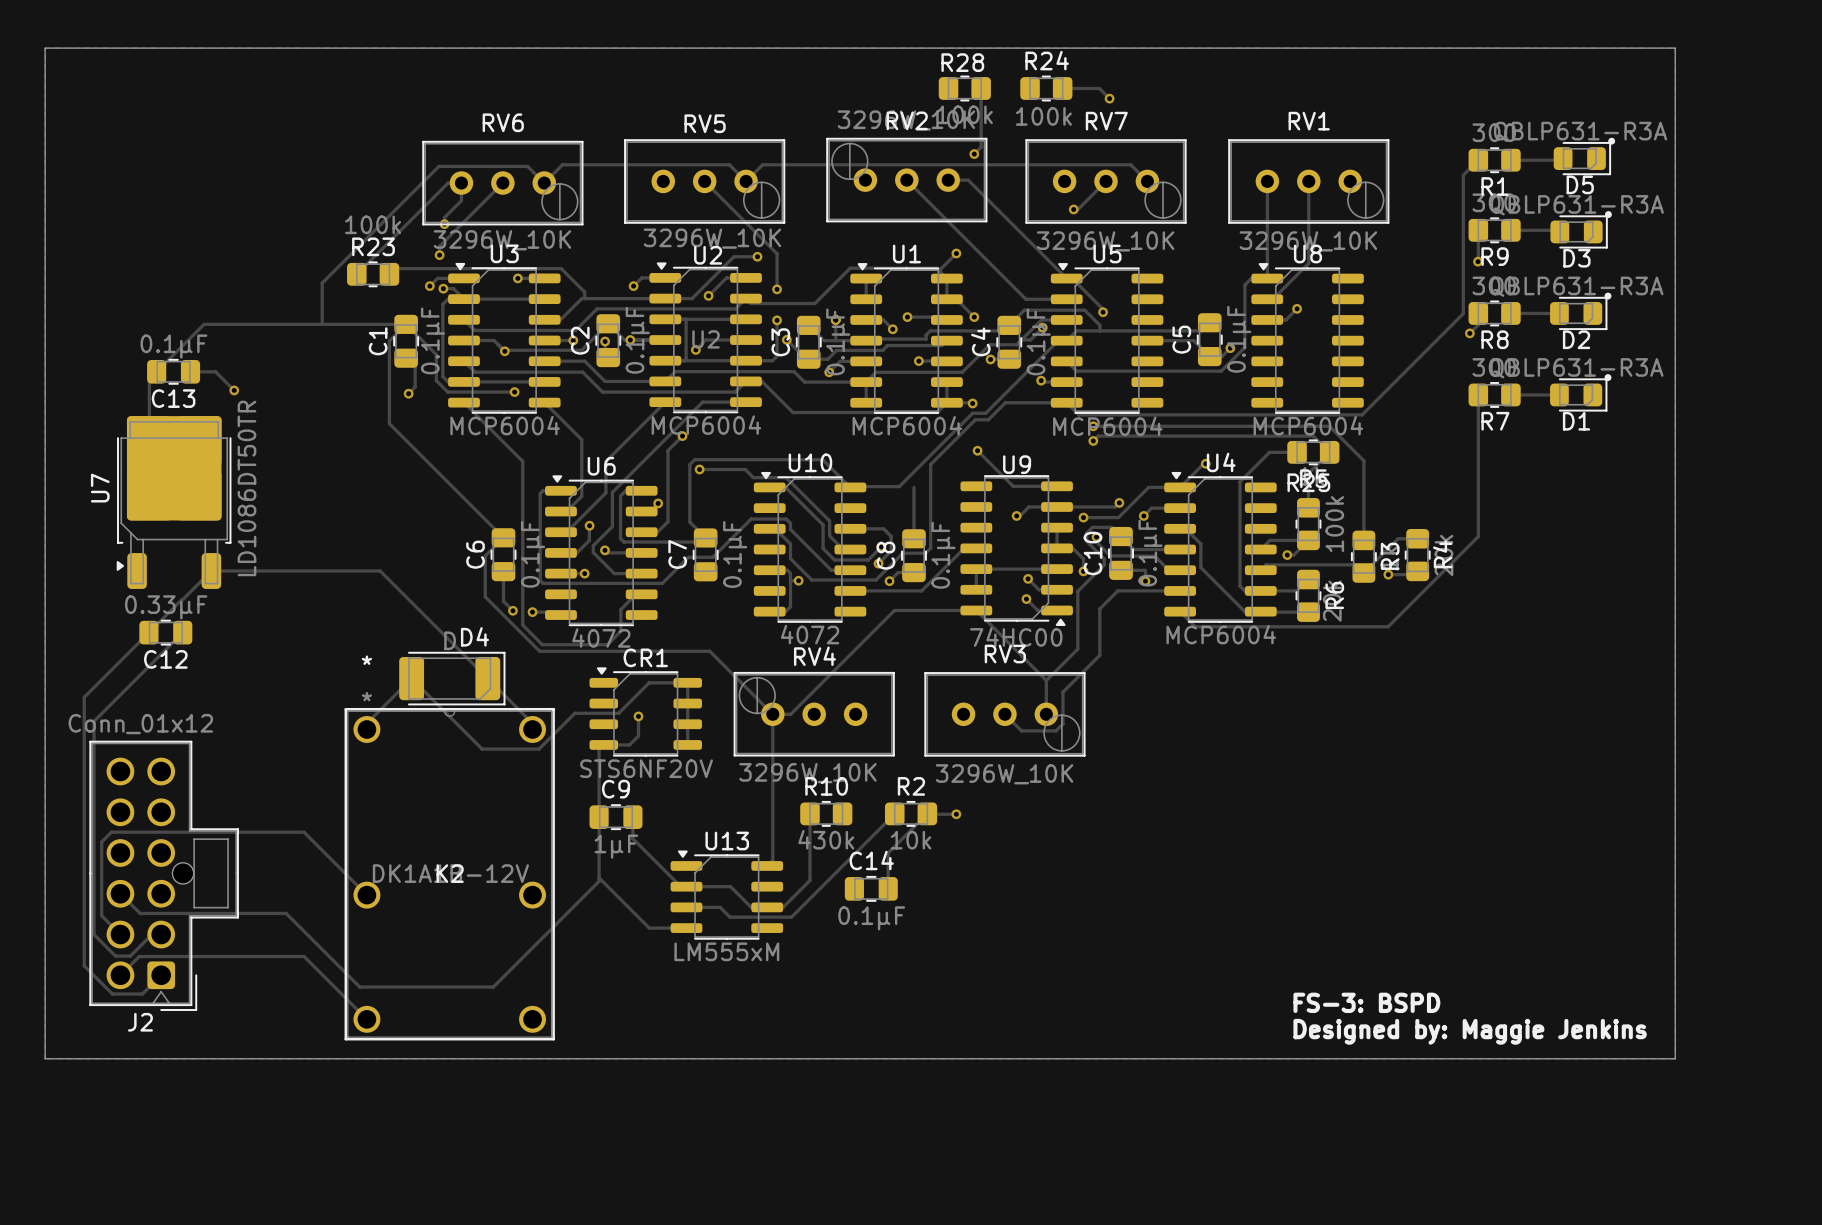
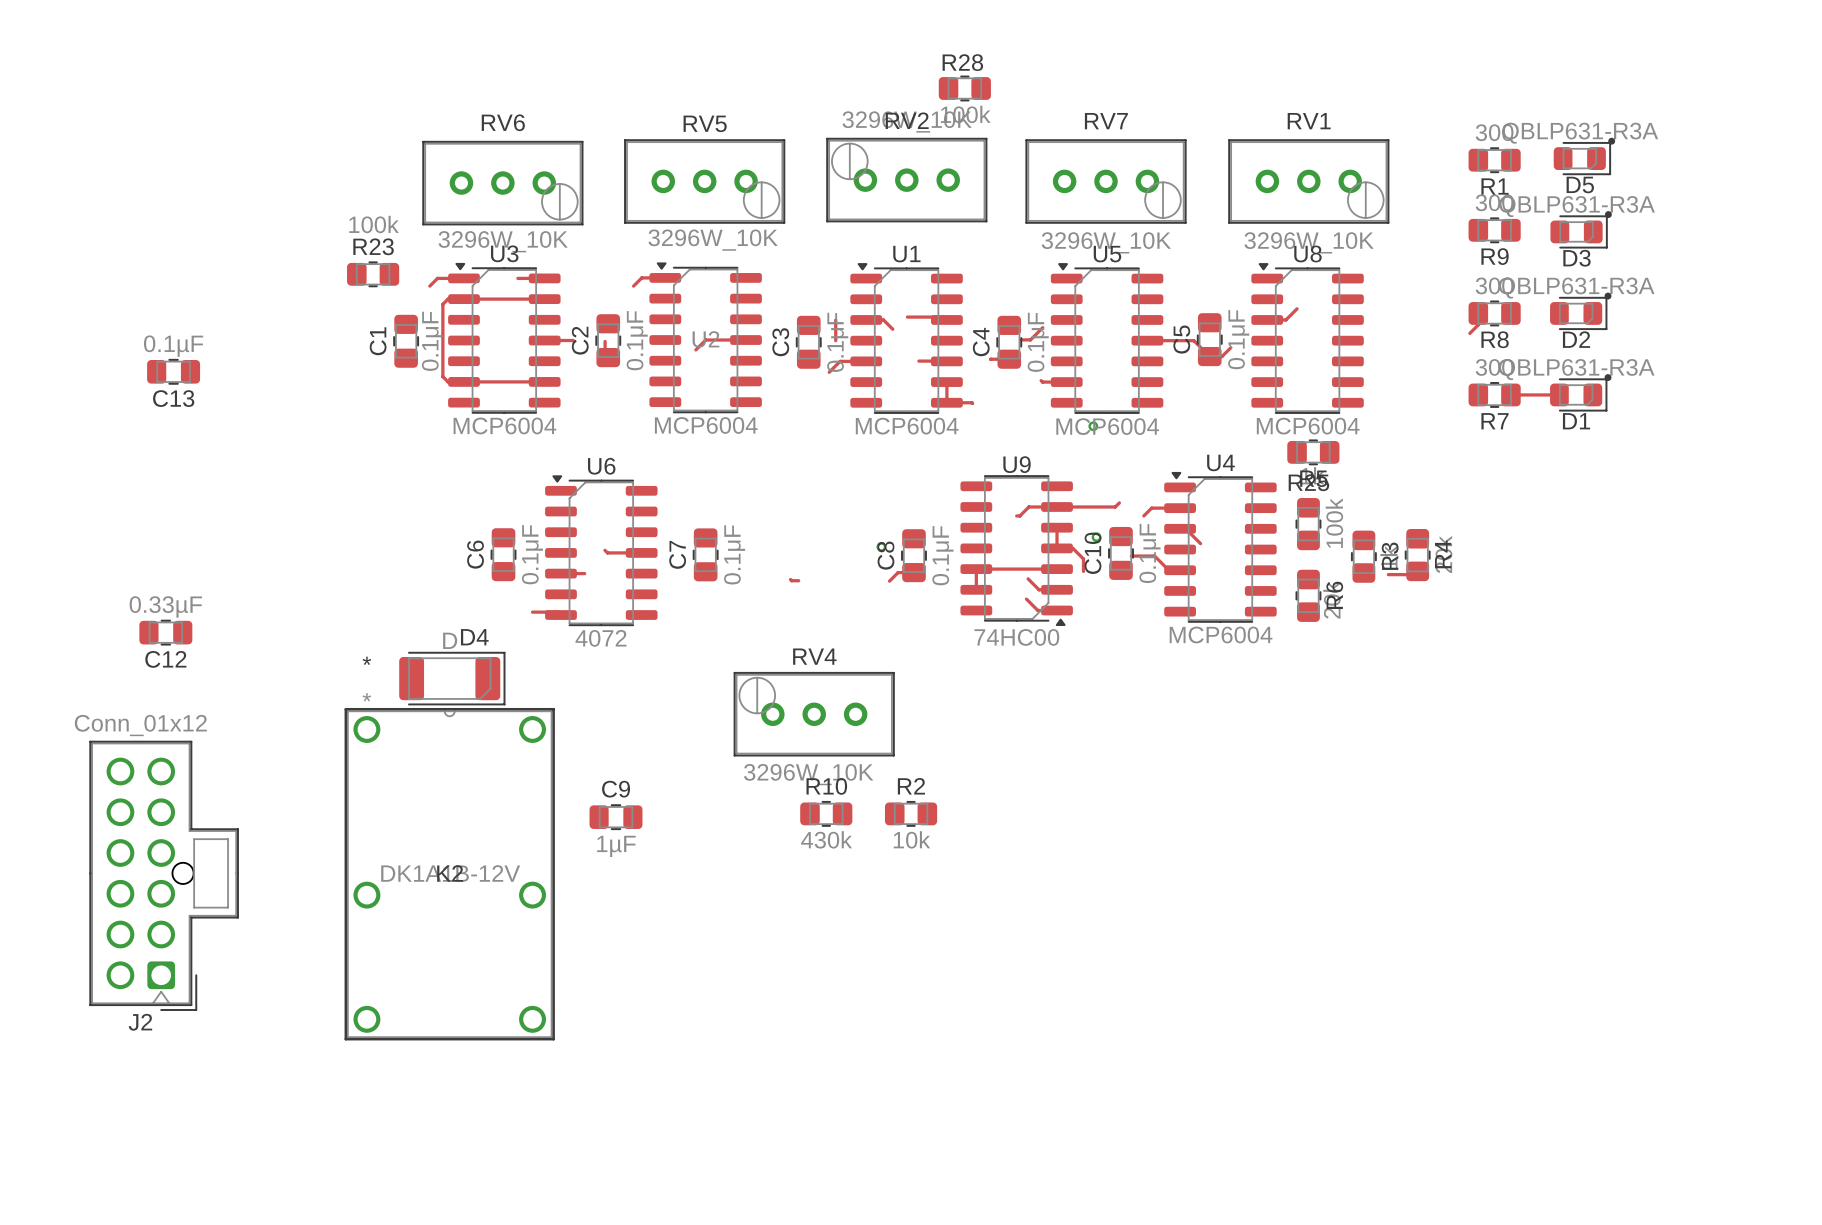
board edge: (45, 48) (1675, 48) (1675, 1058) (45, 1058) (45, 48) -> none
track: (981, 88) (981, 147) (974, 154) -> none
R24: 100k (1046, 88) -> none
track: (1062, 88) (1099, 88) (1109, 98) -> none
via: (1109, 98) -> none
via: (974, 154) -> none
track: (1563, 158) (1561, 160) (1510, 160) -> none
track: (1478, 160) (1463, 175) (1463, 313) (1362, 414) (1078, 414) (1066, 402) (1005, 402) (988, 419) (975, 419) (930, 464) (930, 548) (925, 553) (902, 553) (876, 580) (811, 580) (790, 558) (790, 543) (775, 528) (769, 528) -> none
track: (906, 180) (1025, 299) (1066, 299) -> none
track: (948, 180) (968, 180) (1066, 278) (1072, 278) (1103, 309) (1103, 312) -> none
track: (704, 181) (777, 253) (777, 289) -> none
track: (1106, 181) (1077, 209) (1073, 209) -> none
track: (1147, 181) (1130, 164) (762, 164) (746, 181) (729, 164) (562, 164) (544, 183) (527, 166) (438, 166) (322, 283) (322, 324) -> none
track: (1267, 181) (1267, 278) -> none
track: (1308, 181) (1308, 263) (1272, 299) (1267, 299) -> none
track: (502, 183) (439, 246) (439, 255) -> none
via: (1073, 209) -> none
track: (444, 224) (444, 217) (461, 200) (461, 183) (448, 183) (356, 274) -> none
via: (444, 224) -> none
track: (1478, 230) (1478, 261) -> none
track: (1510, 230) (1558, 230) (1559, 231) -> none
track: (956, 253) (938, 269) -> none
via: (956, 253) -> none
via: (439, 255) -> none
text: U2 (708, 255) -> none
track: (757, 256) (733, 256) (692, 298) (581, 298) (560, 319) -> none
via: (757, 256) -> none
via: (1478, 261) -> none
track: (389, 274) (395, 268) (561, 268) (584, 292) (584, 298) -> none
track: (746, 277) (726, 277) (708, 295) -> none
via: (517, 278) -> none
track: (866, 278) (866, 299) -> none
track: (1267, 278) (1251, 278) (1244, 285) (1244, 347) (1221, 371) (1076, 371) (1066, 361) -> none
via: (429, 286) -> none
via: (633, 286) -> none
track: (443, 288) (453, 288) (463, 299) -> none
via: (443, 288) -> none
via: (777, 289) -> none
via: (708, 295) -> none
via: (1297, 308) -> none
via: (1103, 312) -> none
track: (1510, 313) (1559, 313) -> none
via: (907, 317) -> none
track: (974, 317) (956, 299) (946, 299) (946, 278) (936, 268) (850, 268) (814, 303) (750, 303) (746, 298) (735, 308) (597, 308) (575, 330) (474, 330) (463, 319) -> none
via: (974, 317) -> none
track: (665, 319) (746, 319) -> none
track: (686, 319) (686, 359) (684, 360) -> none
via: (835, 319) -> none
track: (1066, 319) (1041, 319) (1016, 344) (989, 344) (962, 372) (876, 372) (866, 382) -> none
track: (777, 320) (777, 356) (772, 360) (665, 360) -> none
via: (777, 320) -> none
track: (1209, 322) (1201, 330) (1076, 330) (1066, 340) (1058, 340) (985, 413) (972, 413) (899, 486) (850, 487) (822, 459) (694, 459) (689, 464) (689, 522) (705, 537) (701, 542) (624, 542) (620, 538) (620, 496) (625, 490) (641, 490) -> none
track: (406, 324) (436, 354) (436, 380) (447, 392) (514, 392) -> none
track: (406, 324) (204, 324) (149, 380) (149, 441) -> none
track: (406, 324) (389, 341) (389, 423) (503, 537) (485, 556) (485, 596) (539, 651) (709, 651) (772, 714) -> none
track: (808, 325) (824, 340) (926, 339) (926, 335) (930, 330) (1003, 330) (1024, 310) (1084, 310) (1099, 325) (1099, 330) -> none
via: (1042, 327) -> none
via: (892, 329) -> none
via: (1469, 333) -> none
track: (786, 339) (806, 359) (827, 359) (836, 350) (882, 350) (887, 345) (942, 345) (946, 340) -> none
via: (786, 339) -> none
track: (463, 340) (494, 340) (504, 351) -> none
via: (573, 340) -> none
via: (630, 340) -> none
track: (665, 340) (624, 340) (608, 323) (581, 350) (503, 350) -> none
via: (605, 341) -> none
via: (1230, 348) -> none
via: (695, 349) -> none
via: (504, 351) -> none
track: (406, 358) (415, 367) (415, 387) (408, 393) -> none
via: (990, 359) -> none
track: (463, 361) (474, 372) (582, 372) (602, 392) (735, 392) (746, 381) (761, 381) (793, 412) (937, 412) (946, 402) -> none
track: (544, 361) (584, 361) (605, 381) (665, 381) (675, 371) (794, 371) (804, 382) (866, 382) -> none
via: (918, 361) -> none
track: (190, 371) (215, 371) (234, 390) -> none
via: (829, 372) -> none
via: (1041, 380) -> none
track: (866, 382) (866, 402) -> none
via: (234, 390) -> none
via: (514, 392) -> none
via: (408, 393) -> none
track: (1478, 394) (1478, 536) (1388, 626) (1195, 626) (1180, 611) -> none
track: (463, 402) (522, 461) (522, 625) (542, 644) (607, 644) (620, 631) (620, 609) (636, 594) (641, 594) -> none
track: (544, 402) (581, 439) (581, 496) (566, 511) (560, 511) -> none
track: (665, 402) (605, 461) (605, 492) (566, 532) (560, 532) -> none
track: (746, 402) (702, 402) (612, 492) (612, 526) (593, 545) (593, 552) (614, 573) (641, 573) -> none
via: (972, 403) -> none
track: (1093, 426) (1329, 426) (1363, 460) (1363, 540) -> none
track: (682, 436) (667, 450) (667, 521) (657, 532) (641, 532) -> none
via: (682, 436) -> none
track: (1093, 440) (1098, 436) (1313, 436) (1329, 452) (1308, 473) (1308, 507) -> none
via: (1093, 440) -> none
track: (977, 450) (1013, 486) (1057, 486) -> none
via: (977, 450) -> none
track: (1297, 452) (1269, 452) (1240, 481) (1240, 586) (1244, 590) (1297, 590) (1308, 579) -> none
track: (1205, 463) (1180, 487) (1148, 487) (1118, 517) (1083, 517) -> none
via: (1205, 463) -> none
track: (699, 469) (745, 469) (753, 477) (786, 477) (829, 521) (829, 535) (843, 549) (850, 549) -> none
via: (699, 469) -> none
track: (769, 487) (785, 487) (823, 524) (823, 548) (834, 559) (868, 559) (881, 546) -> none
track: (913, 487) (913, 538) -> none
track: (560, 490) (543, 490) (540, 493) (540, 580) (542, 583) (662, 583) (688, 557) (712, 557) (751, 519) (786, 519) (790, 523) (790, 529) (831, 570) (850, 570) -> none
U7: LD1086DT50TR (174, 502) -> none
via: (1119, 502) -> none
via: (658, 503) -> none
via: (1016, 515) -> none
via: (1143, 515) -> none
via: (1083, 517) -> none
track: (589, 525) (589, 540) (576, 552) (560, 552) -> none
via: (589, 525) -> none
track: (850, 528) (883, 528) (891, 536) (891, 551) (878, 563) -> none
track: (1096, 537) (1096, 542) (1110, 555) (1131, 555) -> none
track: (1417, 538) (1398, 538) (1363, 573) (1355, 564) (1266, 564) (1260, 570) -> none
track: (1200, 543) (1200, 567) (1244, 611) (1308, 612) -> none
U10: 4072 (810, 547) -> none
track: (976, 548) (964, 548) (921, 590) (850, 590) -> none
track: (1180, 549) (1134, 549) (1111, 527) (1092, 527) (1086, 533) (1086, 541) (1104, 558) (1104, 564) (1077, 591) (1077, 649) (1046, 680) -> none
track: (1260, 549) (1269, 540) (1308, 540) (1293, 555) (1287, 555) -> none
via: (604, 550) -> none
via: (1287, 555) -> none
via: (878, 563) -> none
track: (769, 570) (787, 570) (790, 573) (790, 606) (785, 611) (769, 611) -> none
track: (1121, 570) (1145, 570) (1145, 581) -> none
track: (503, 571) (503, 601) (512, 610) -> none
via: (1083, 571) -> none
via: (584, 573) -> none
via: (1388, 574) -> none
via: (1028, 578) -> none
via: (798, 580) -> none
via: (889, 581) -> none
via: (1145, 581) -> none
track: (1180, 590) (1117, 590) (1099, 608) (1099, 655) (1062, 692) (1062, 723) (1056, 730) (1021, 730) (1004, 714) -> none
via: (1026, 599) -> none
via: (512, 610) -> none
via: (532, 612) -> none
track: (182, 632) (94, 721) (94, 934) (115, 956) (130, 956) (151, 934) (161, 934) -> none
track: (1046, 680) (976, 610) (894, 610) (790, 714) (772, 714) -> none
track: (1046, 680) (1046, 714) -> none
CR1: STS6NF20V (645, 711) -> none
track: (772, 714) (772, 860) (767, 865) -> none
RV3: 3296W_10K (1004, 714) -> none
track: (638, 716) (638, 736) (629, 744) (603, 744) (599, 749) (599, 881) (493, 987) (359, 987) (286, 913) (140, 913) (120, 893) -> none
via: (638, 716) -> none
track: (366, 729) (366, 723) (411, 678) (482, 749) (539, 749) (574, 713) (618, 713) (649, 682) (687, 682) (687, 744) -> none
track: (532, 729) (532, 723) (380, 571) (211, 571) (84, 697) (84, 965) (112, 994) (142, 994) (161, 975) -> none
track: (809, 813) (809, 880) (783, 907) (751, 907) (730, 886) (680, 886) (632, 838) (632, 817) -> none
track: (894, 813) (791, 917) (729, 917) (720, 907) (686, 907) -> none
track: (956, 814) (927, 813) (888, 853) (888, 888) -> none
via: (956, 814) -> none
track: (599, 877) (649, 928) (686, 928) -> none
C14: 0.1μF (871, 888) -> none
track: (366, 895) (303, 832) (111, 832) (101, 841) (101, 915) (120, 934) -> none
U13: LM555xM (726, 895) -> none
track: (120, 975) (139, 956) (304, 956) (366, 1019) -> none
text: FS-3: BSPD (1366, 1002) -> none
text: Designed by: Maggie Jenkins (1470, 1031) -> none

